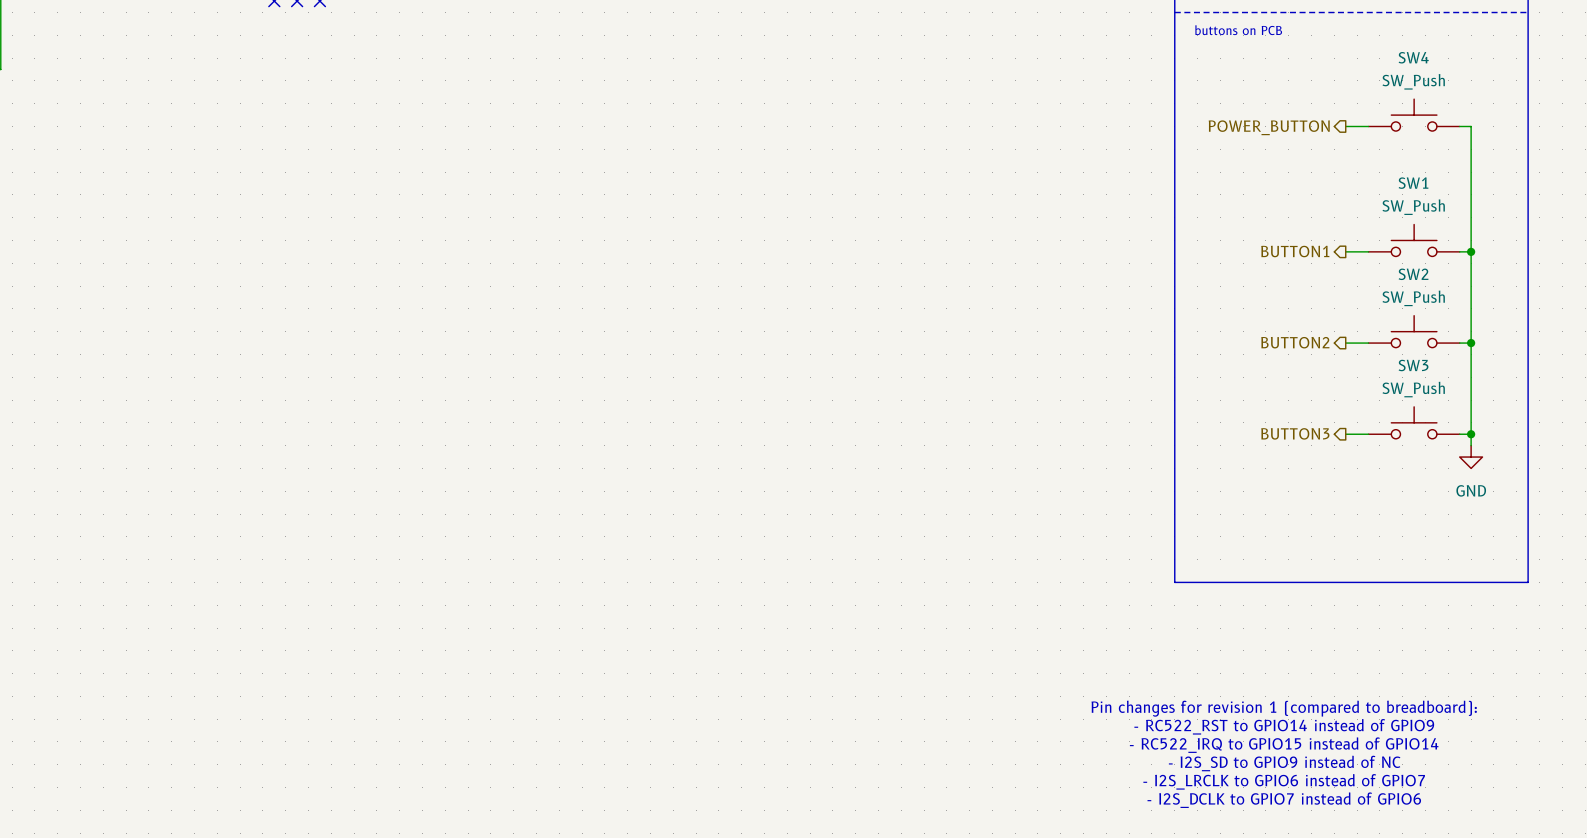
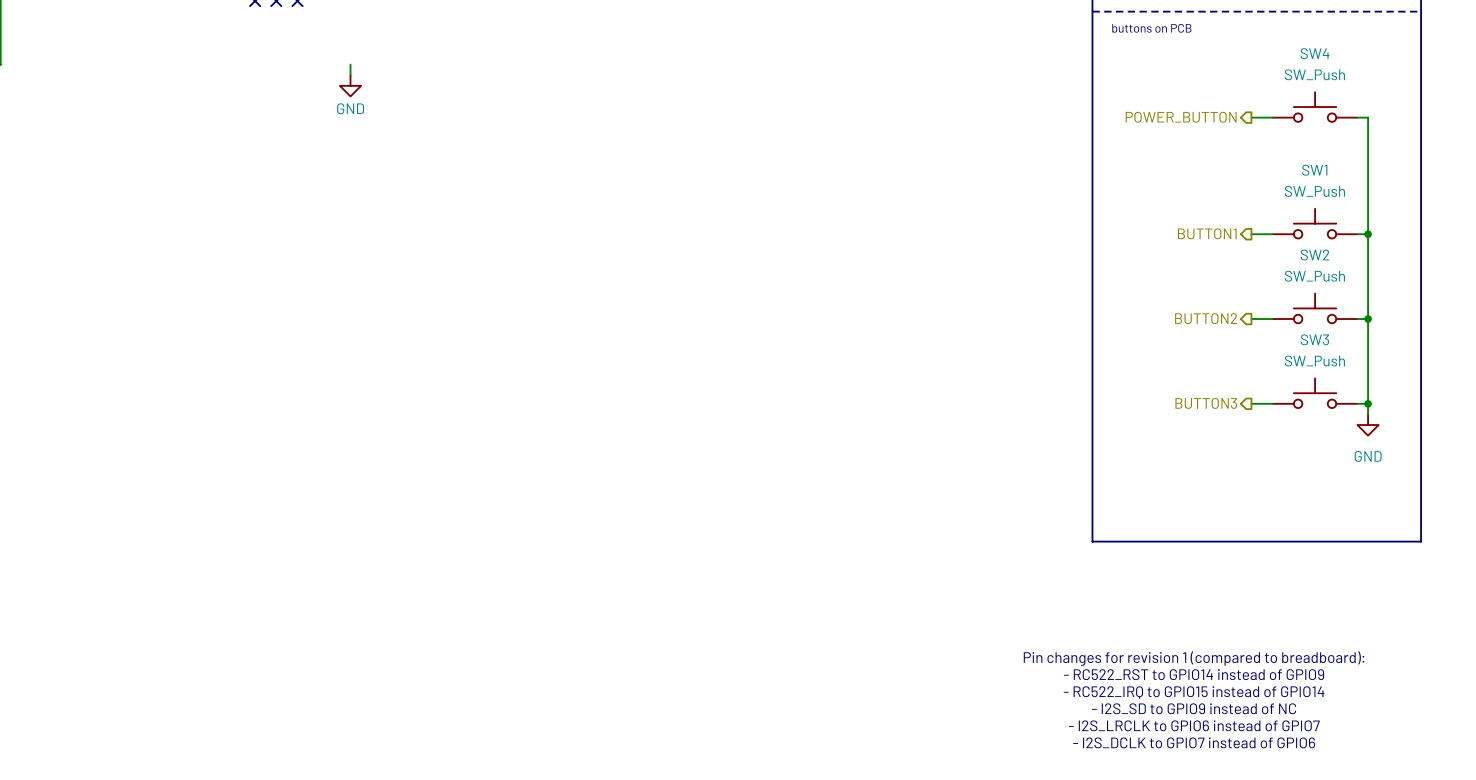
wire: none -> (350, 64) (350, 75)
power symbol: none -> GND (350, 85)

